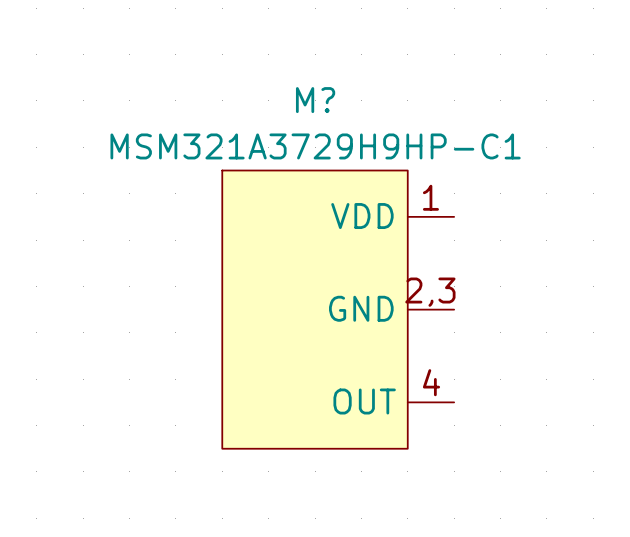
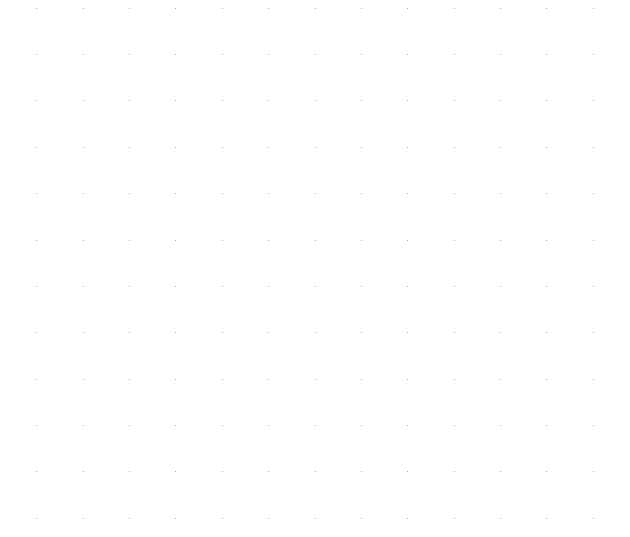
M?: MSM321A3729H9HP-C1 (338, 309) -> none

